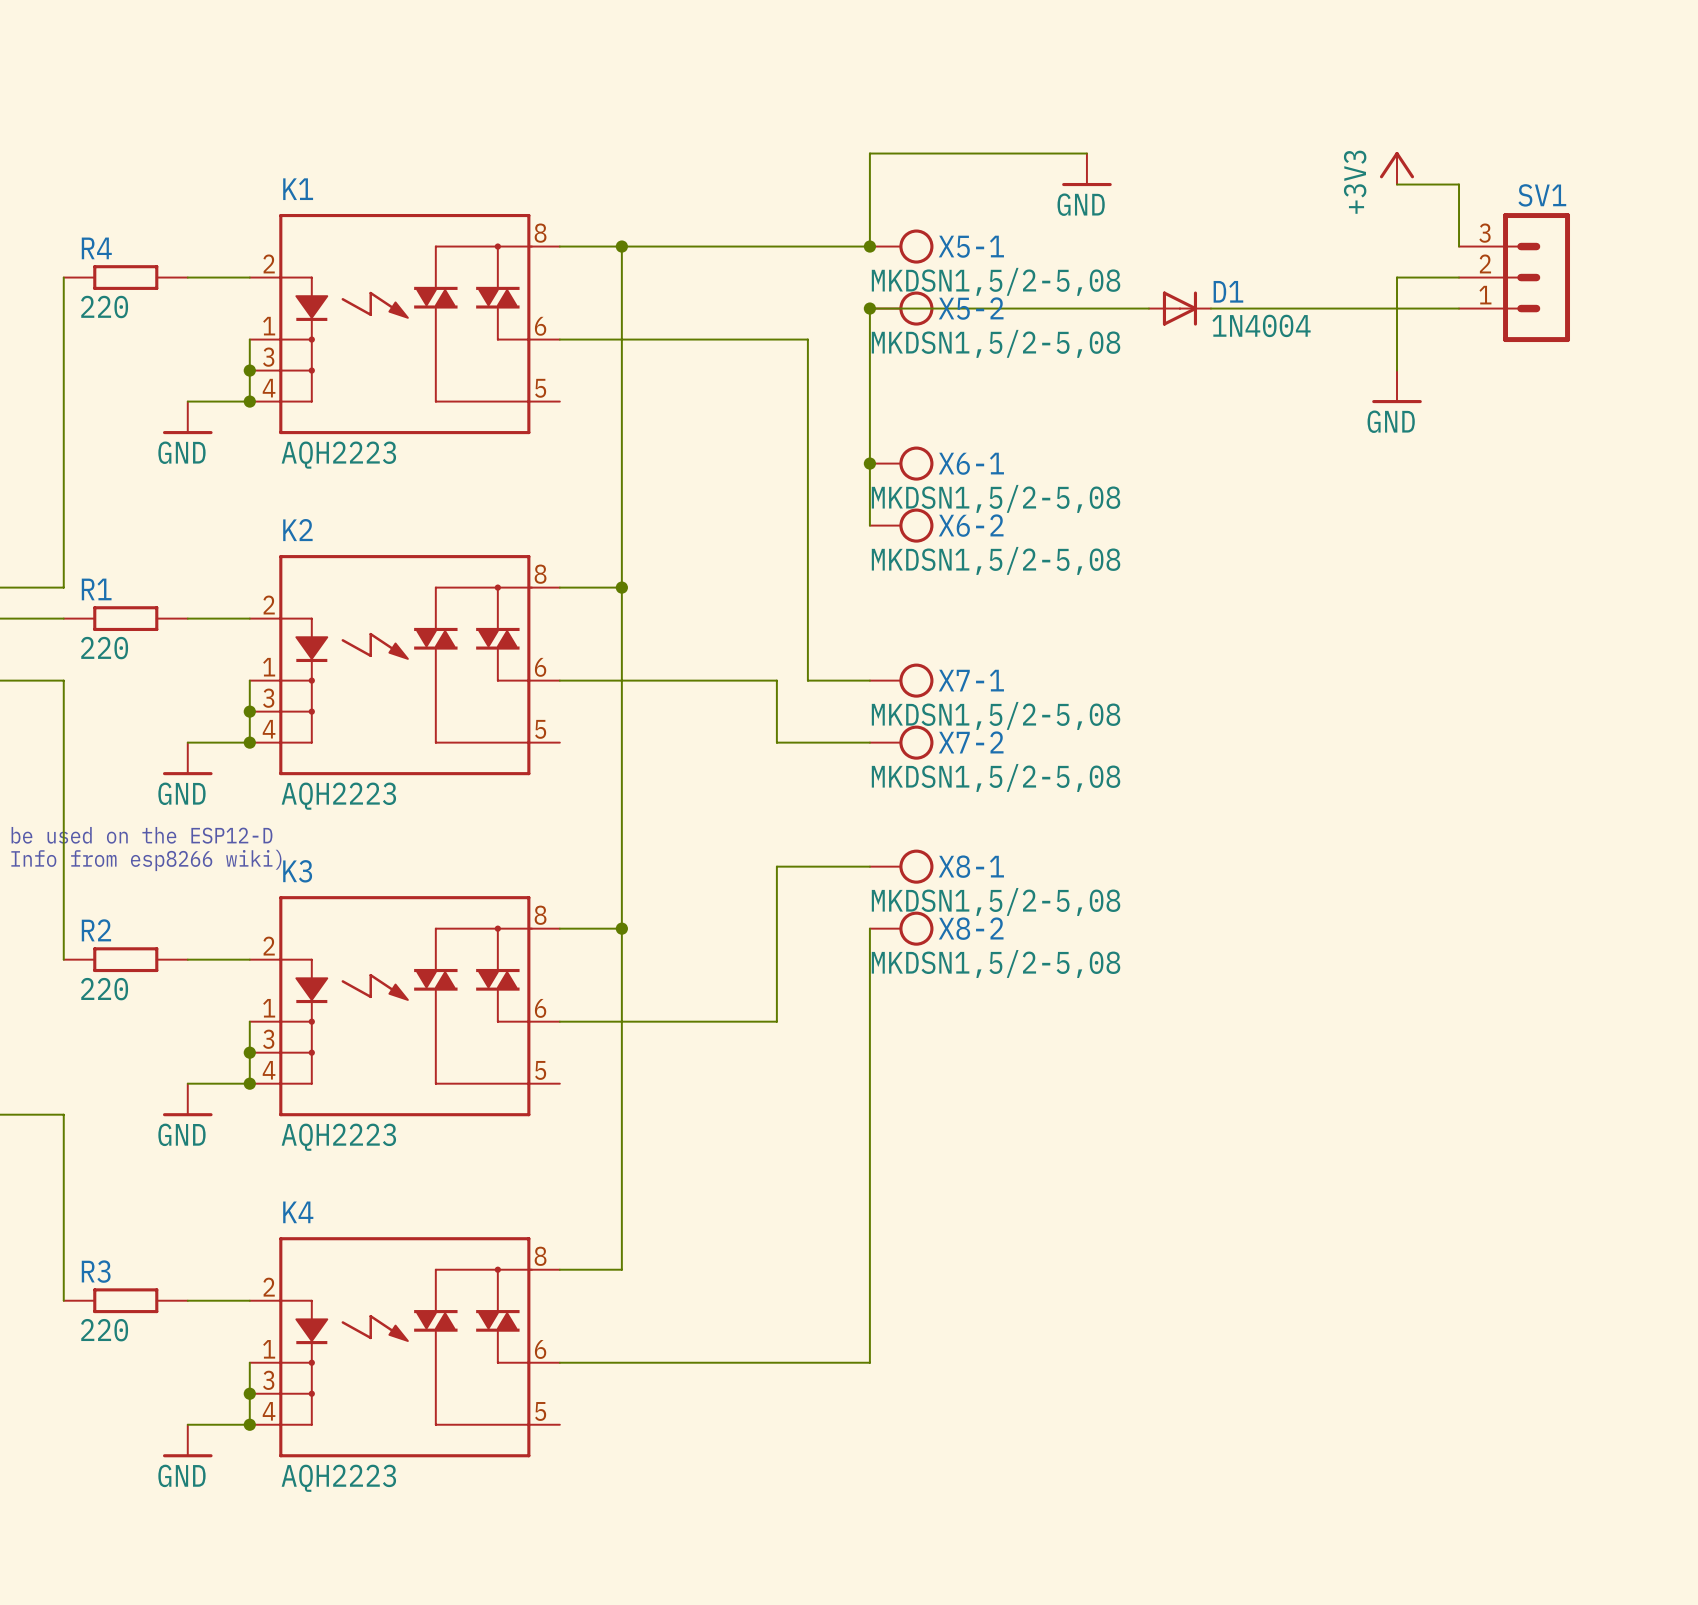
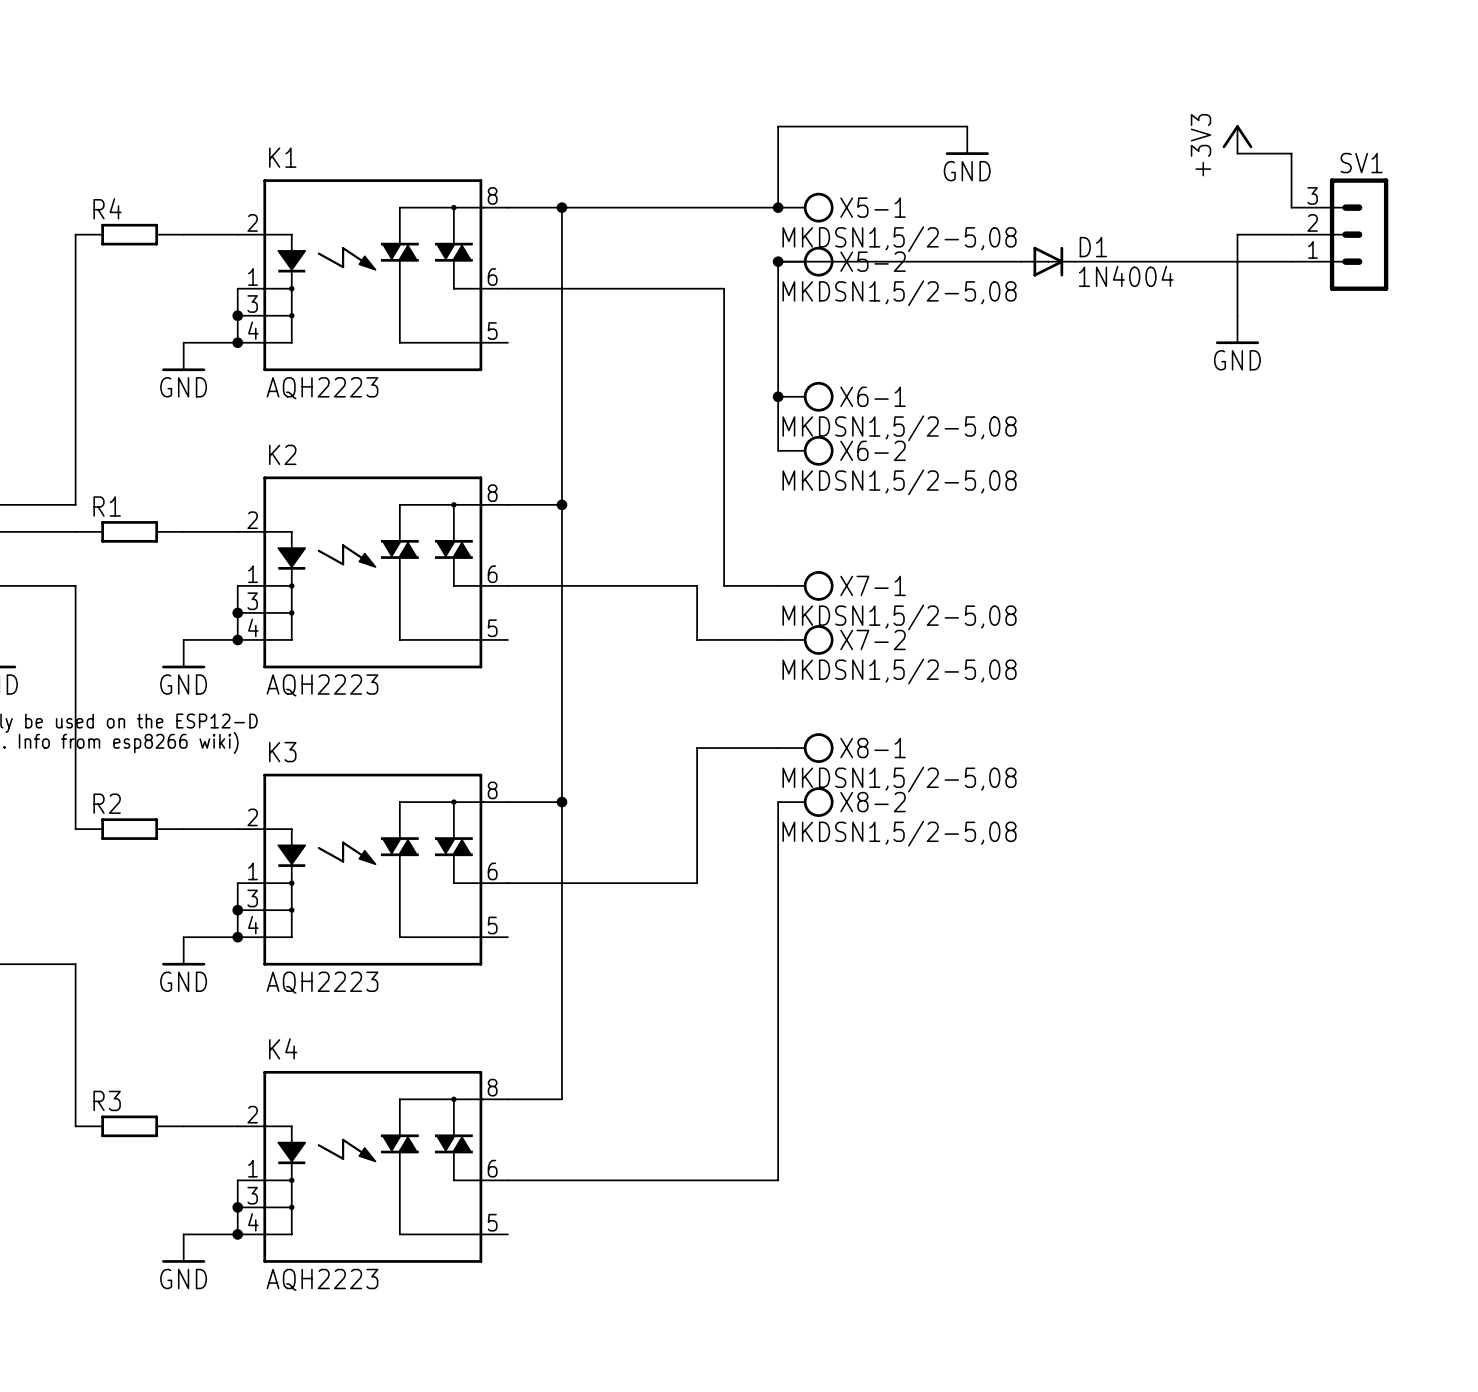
R4 value: 220 (104, 307) -> none
R1 value: 220 (104, 648) -> none
R2 value: 220 (104, 989) -> none
R3 value: 220 (104, 1330) -> none

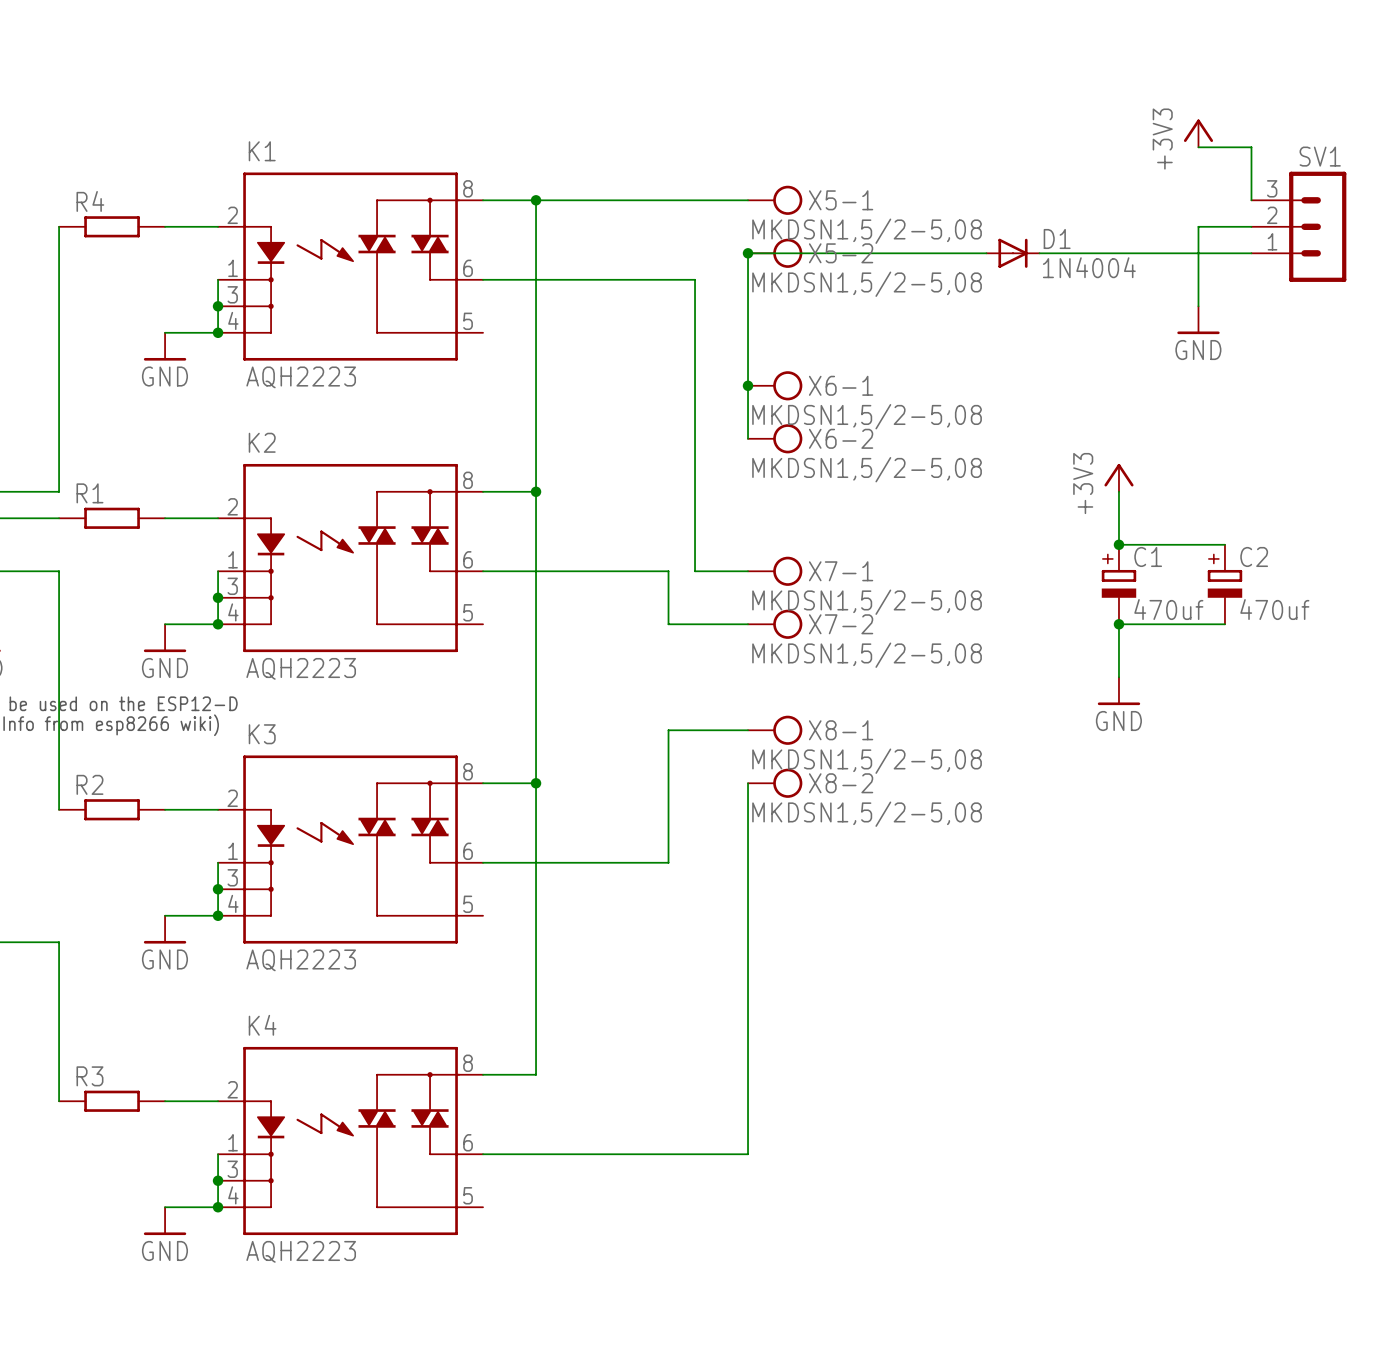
wire: (967, 126) (778, 126) (778, 207) -> none
power symbol: GND (967, 140) -> none
junction: (778, 207) -> none
power symbol: none -> +3V3 (1118, 477)
wire: none -> (1118, 491) (1118, 544) (1224, 544)
junction: none -> (1118, 544)
C1: none -> 470uf (1118, 584)
C2: none -> 470uf (1224, 584)
junction: none -> (1118, 624)
wire: none -> (1224, 624) (1118, 624) (1118, 677)
power symbol: none -> GND (1118, 691)

